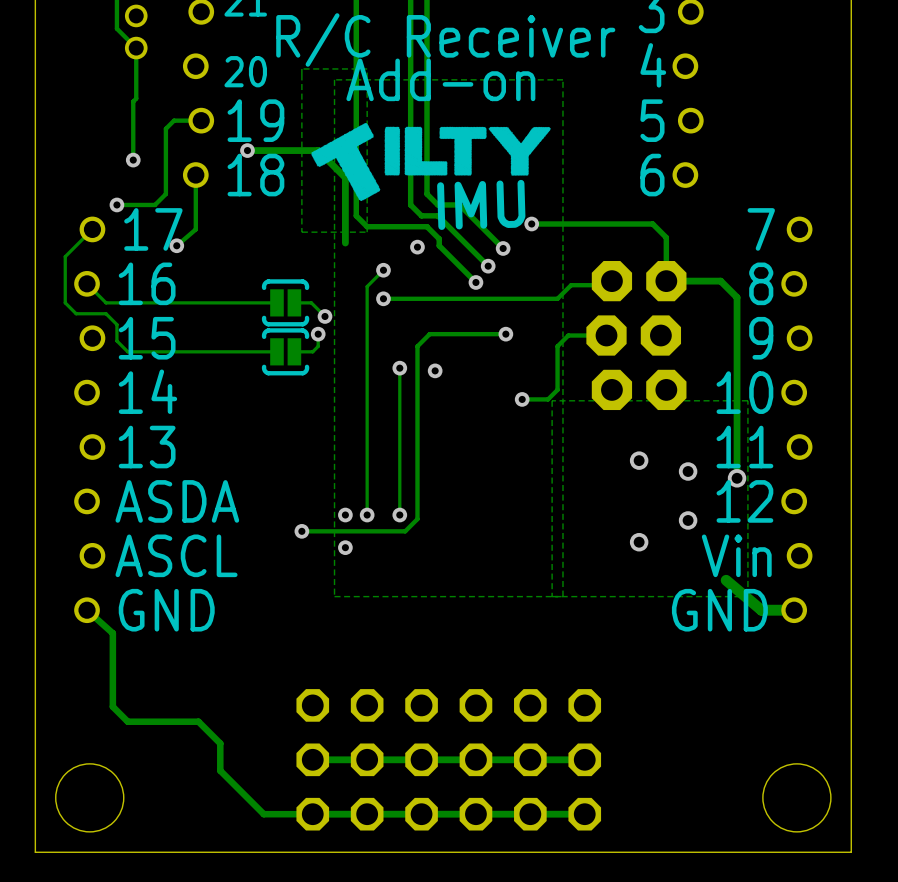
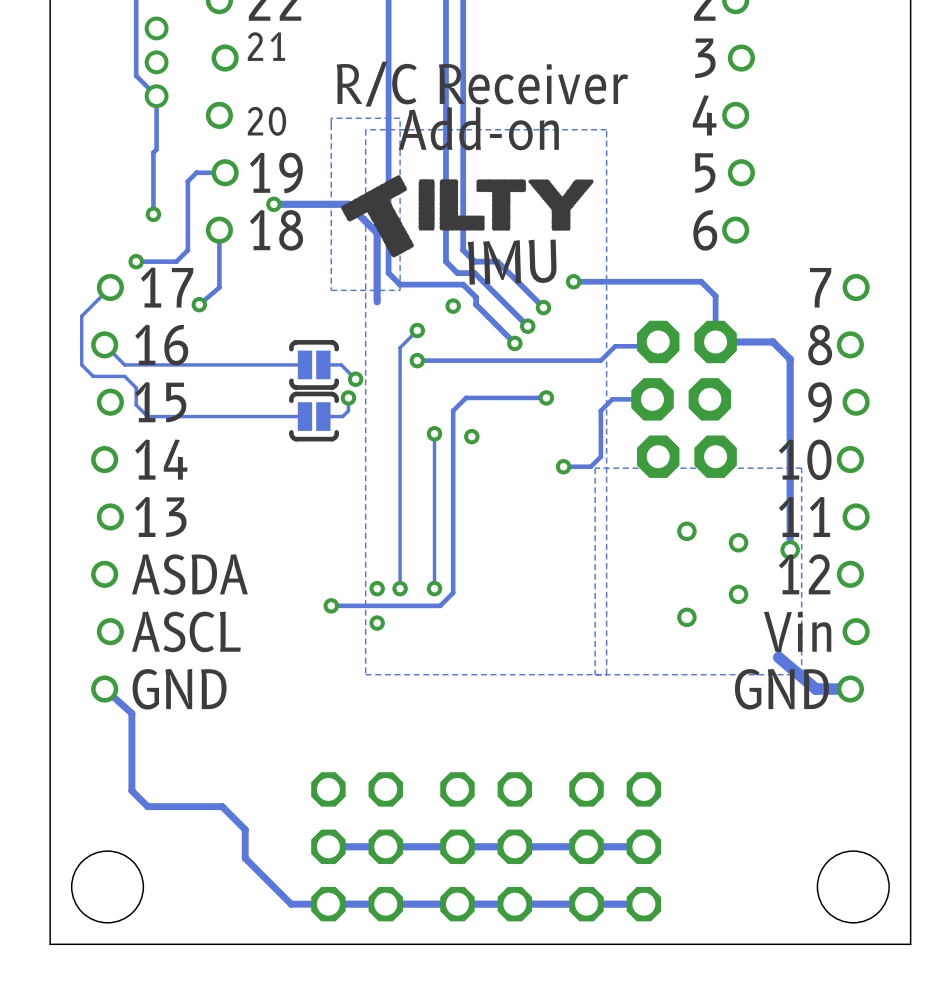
part footprint: [296, 689, 602, 831] -> [311, 772, 662, 922]

